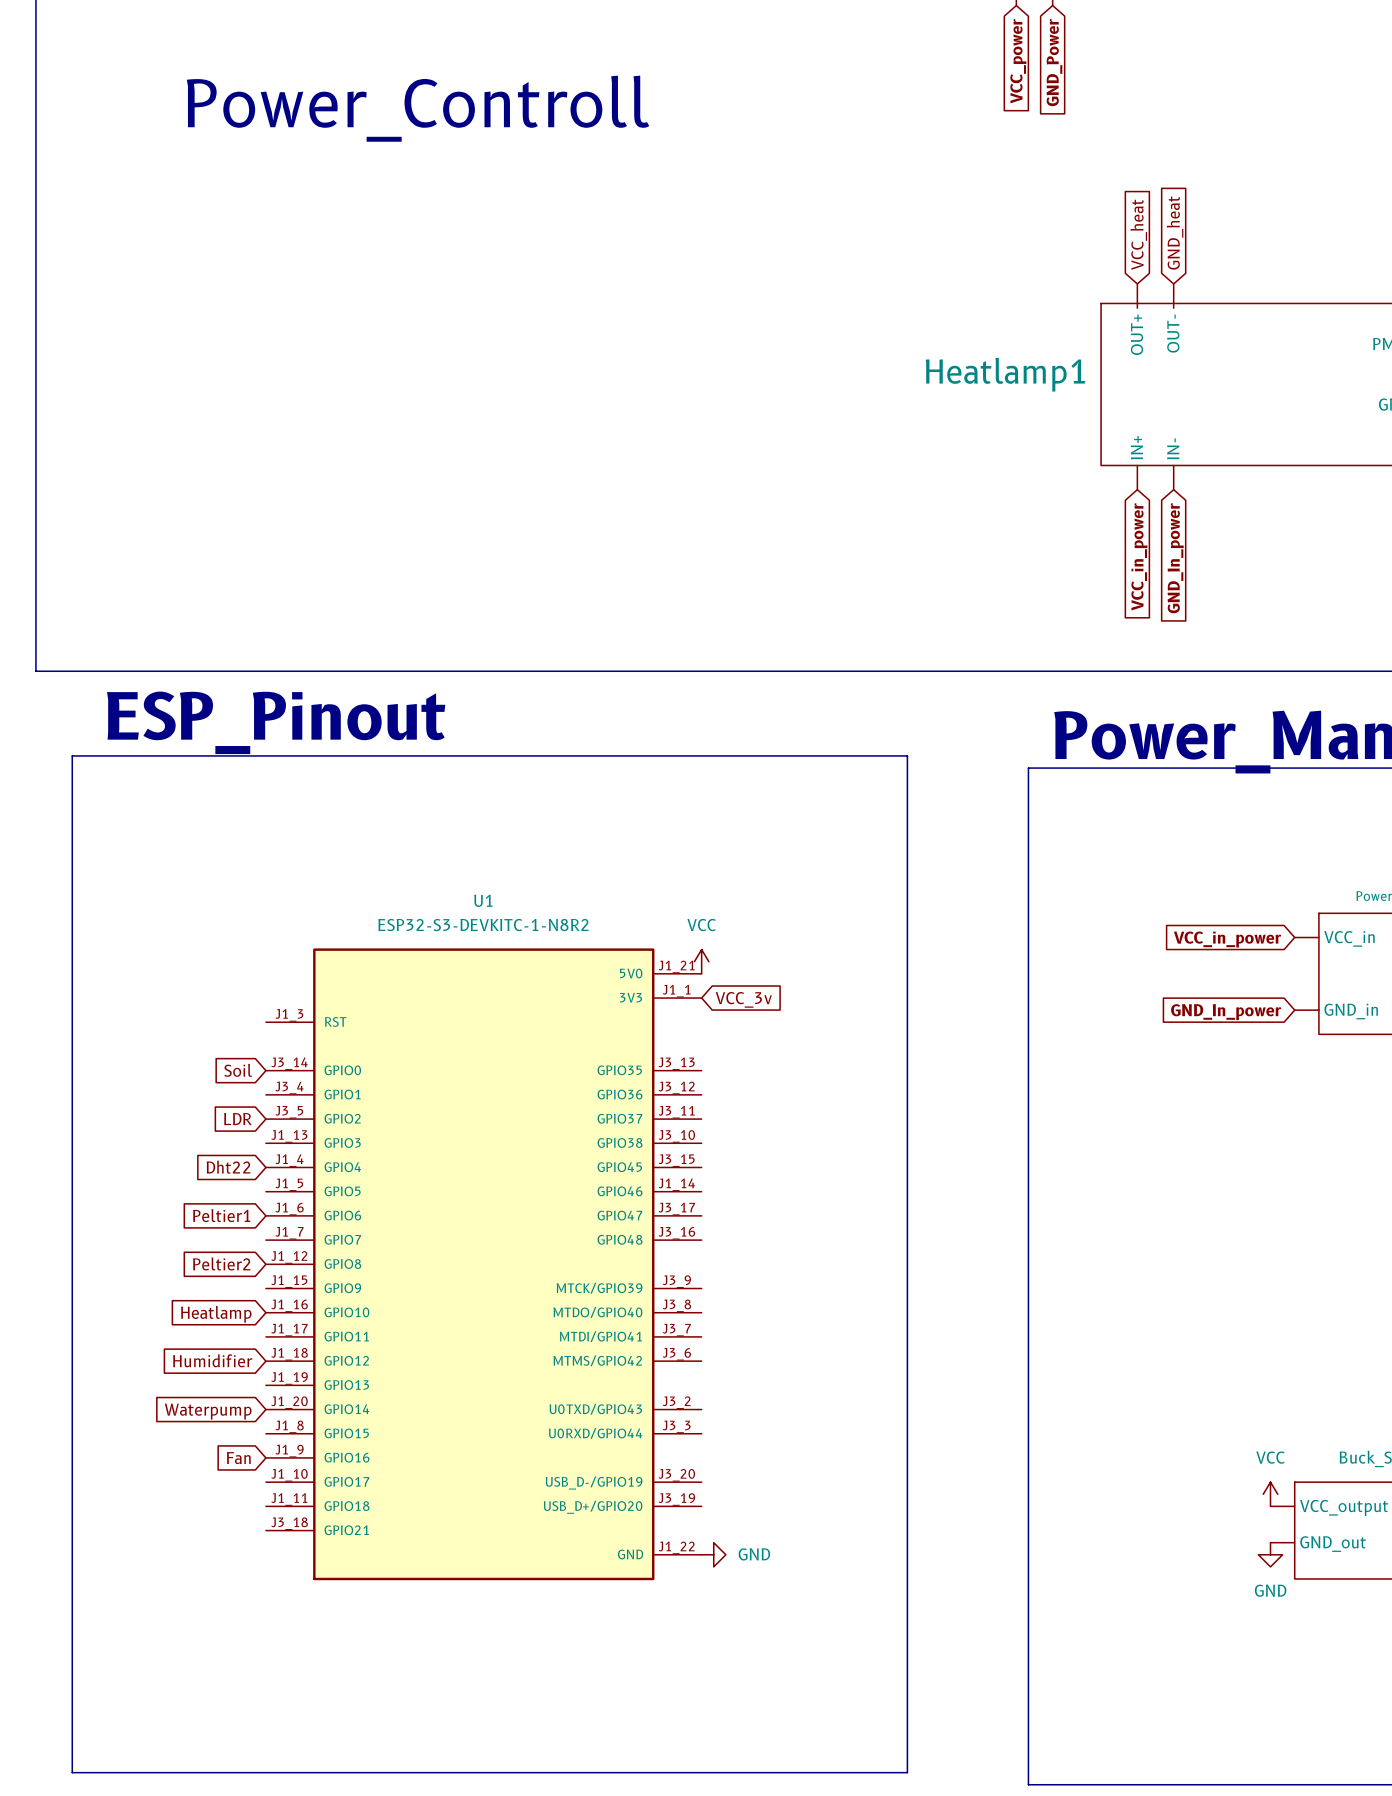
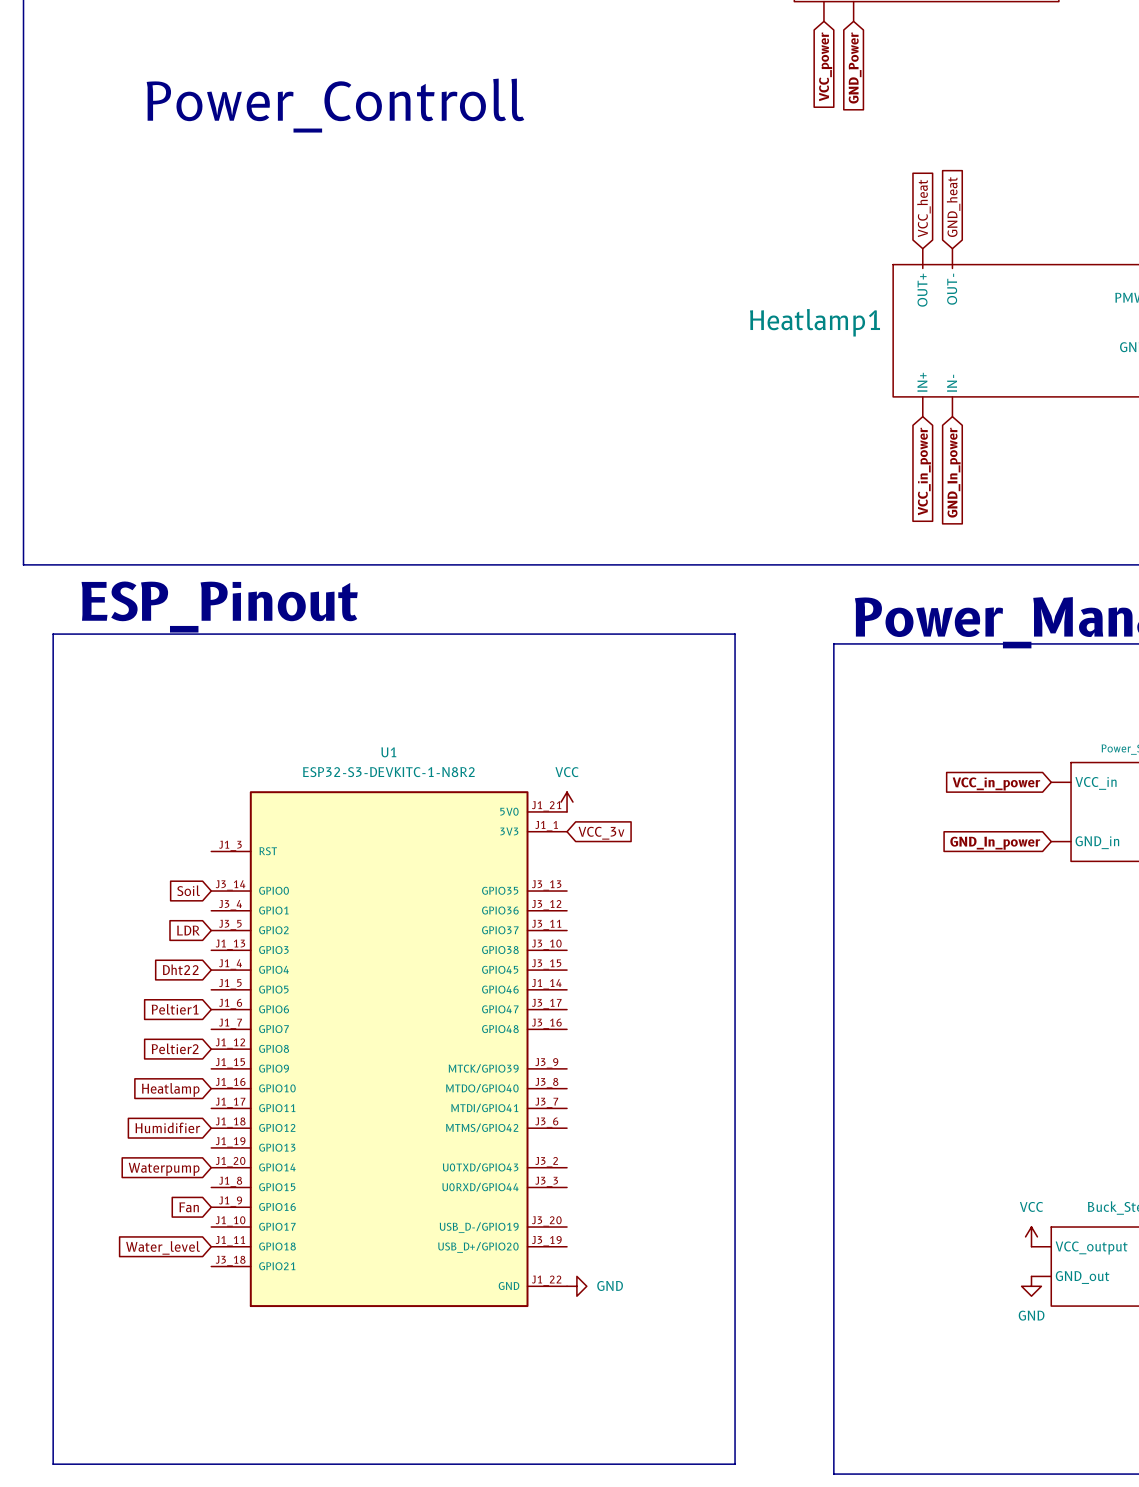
global label: none -> Water_level (163, 1247)

